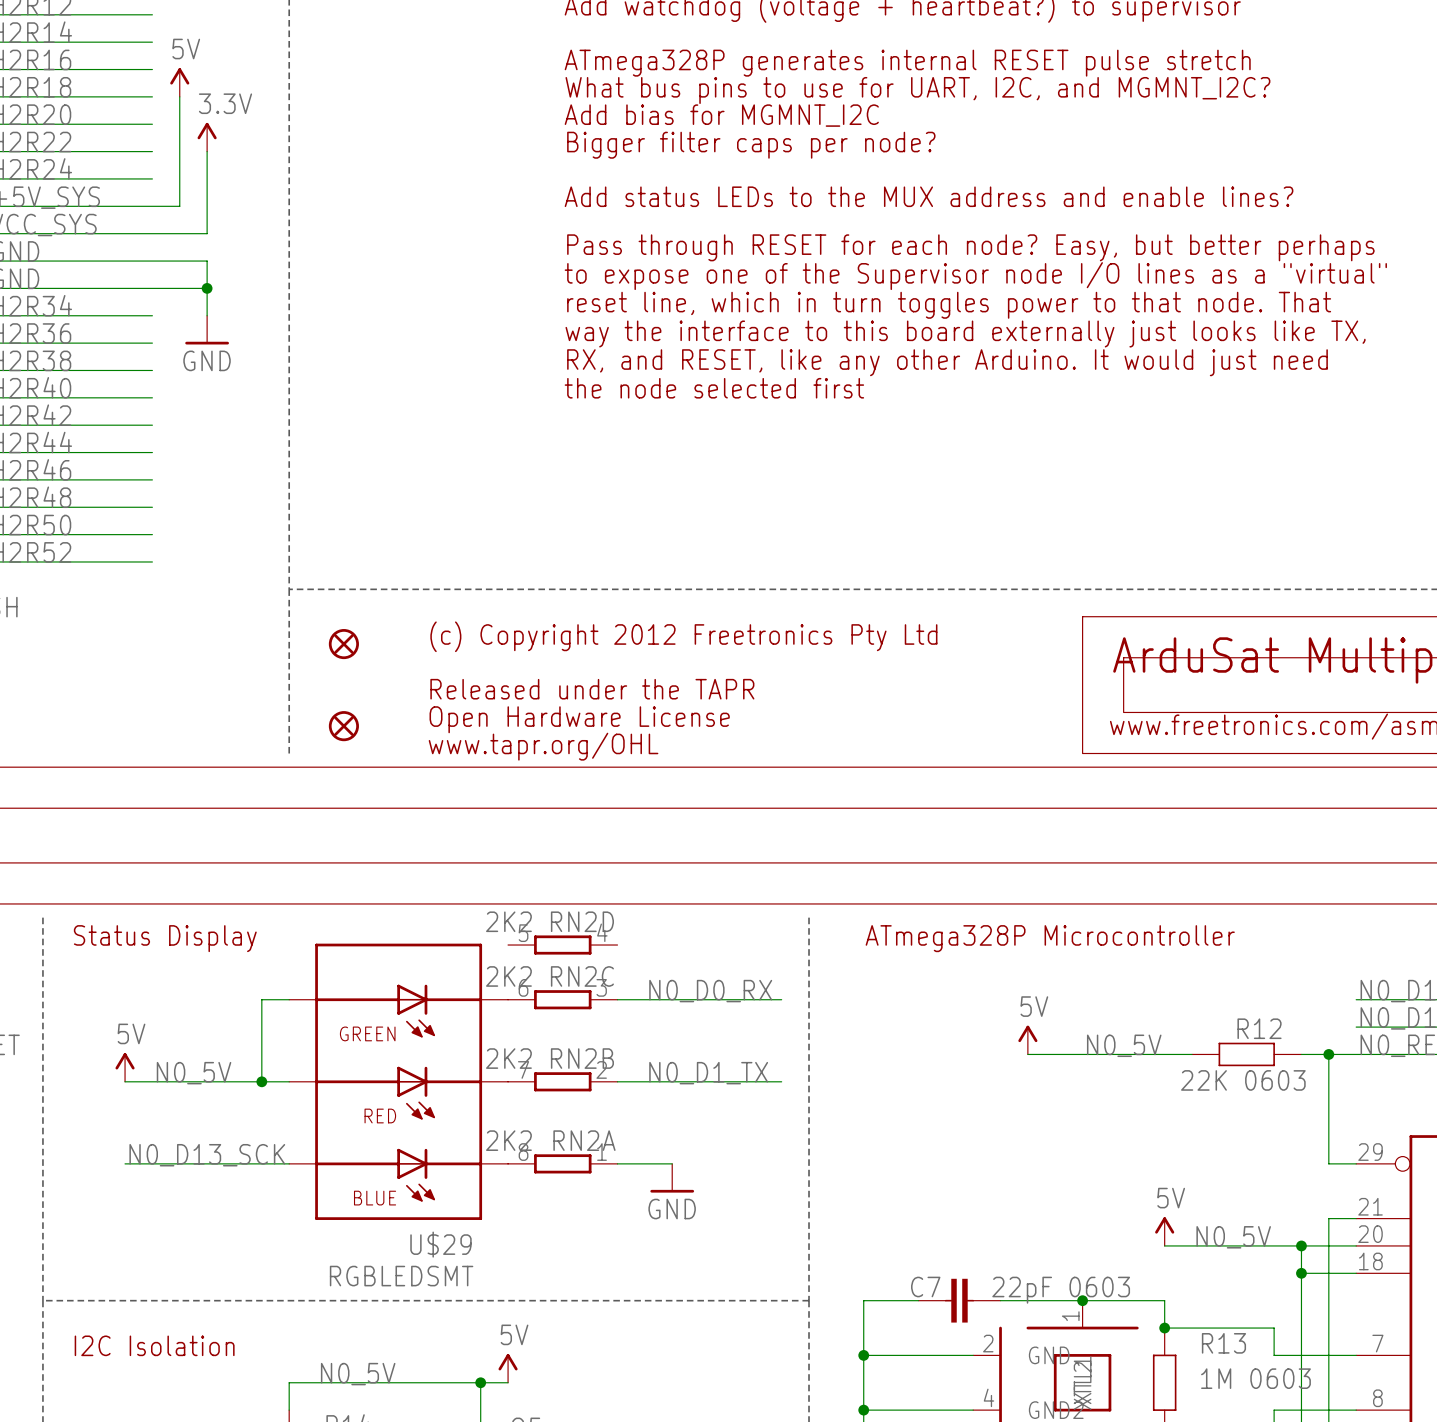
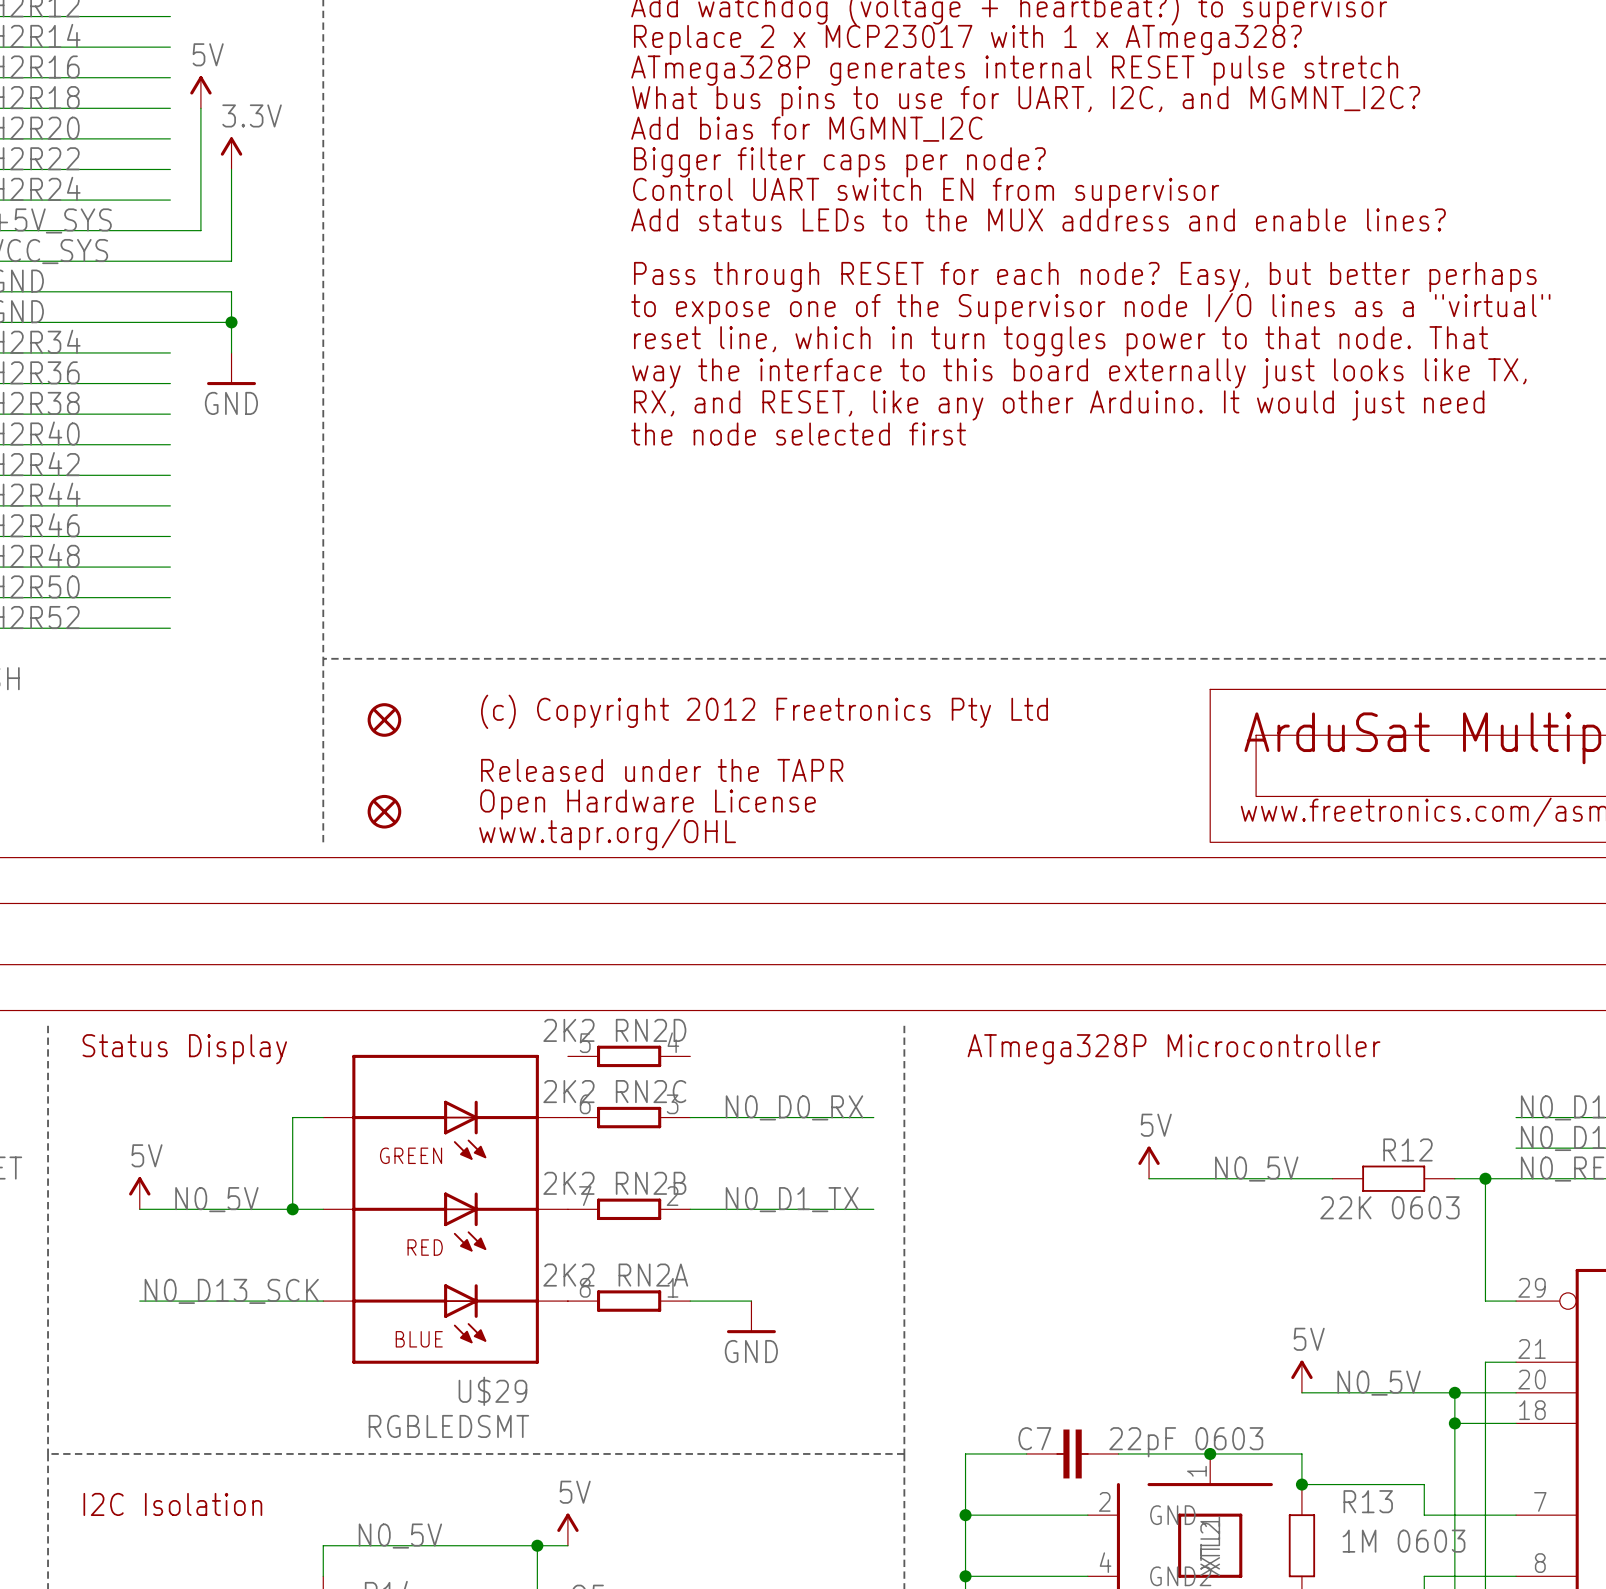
text: none -> Replace 2 x MCP23017 with 1 x ATmega328? (967, 40)
text: none -> Control UART switch EN from supervisor (926, 192)

